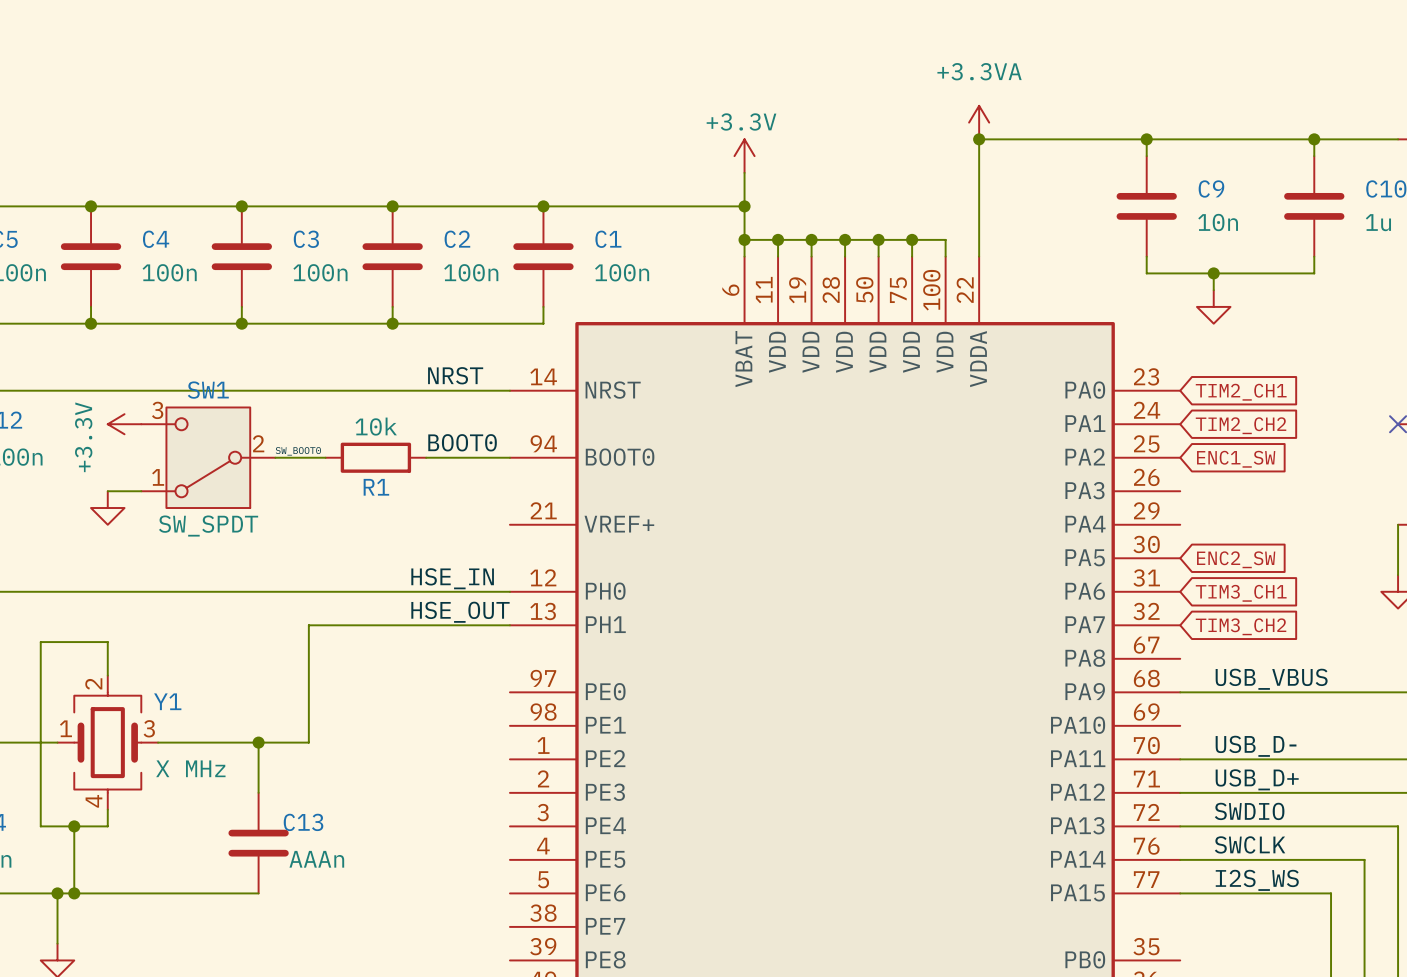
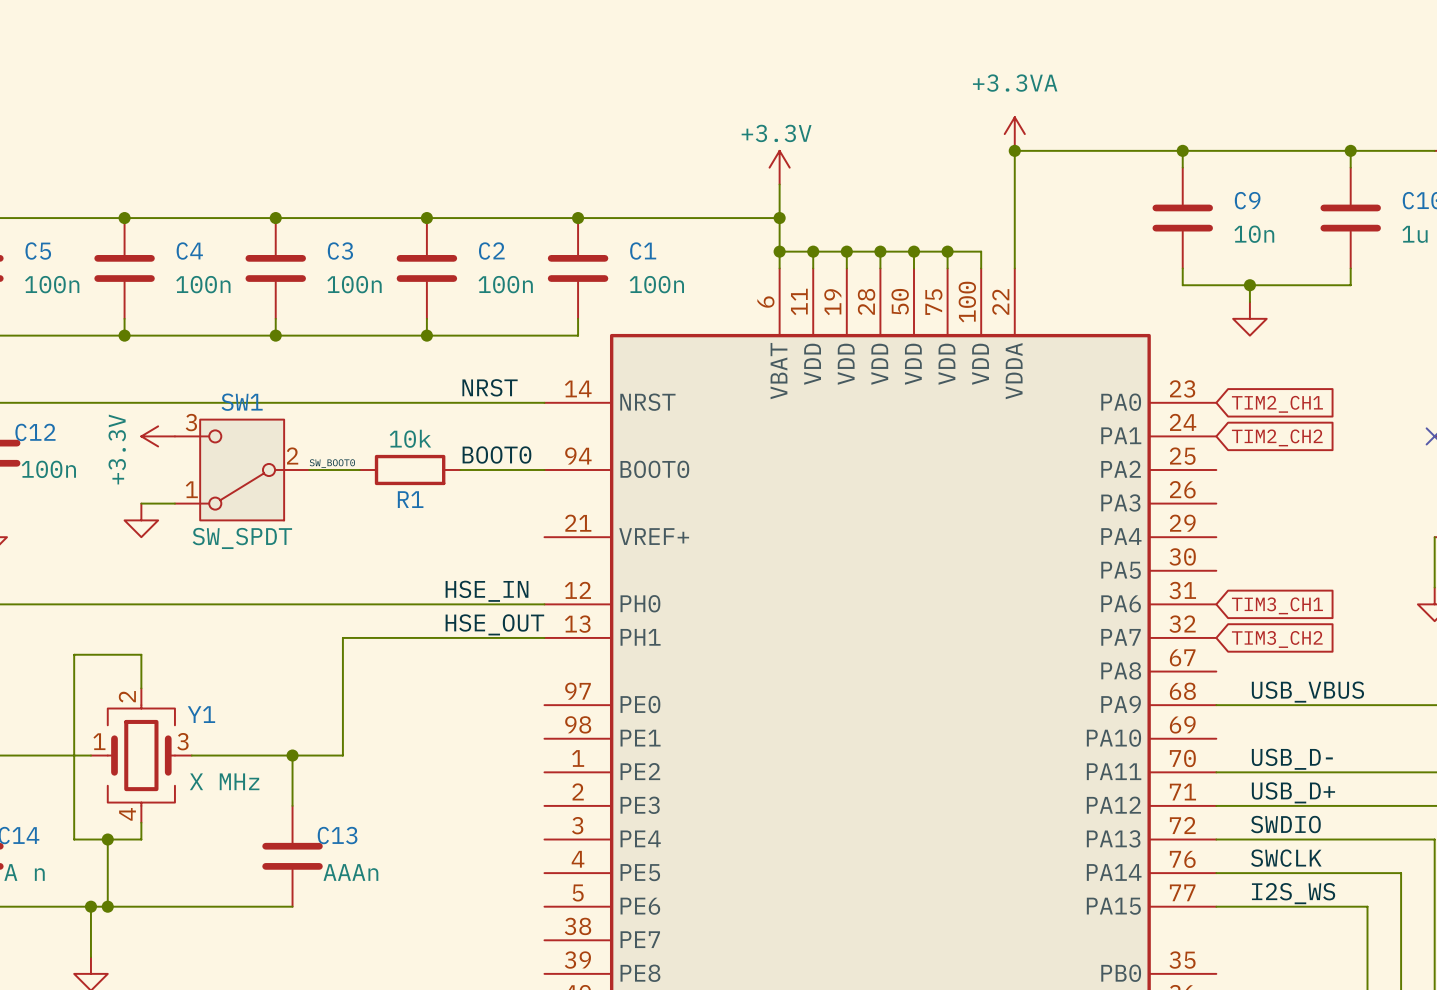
global label: ENC1_SW (1236, 459) -> none
global label: ENC2_SW (1236, 559) -> none

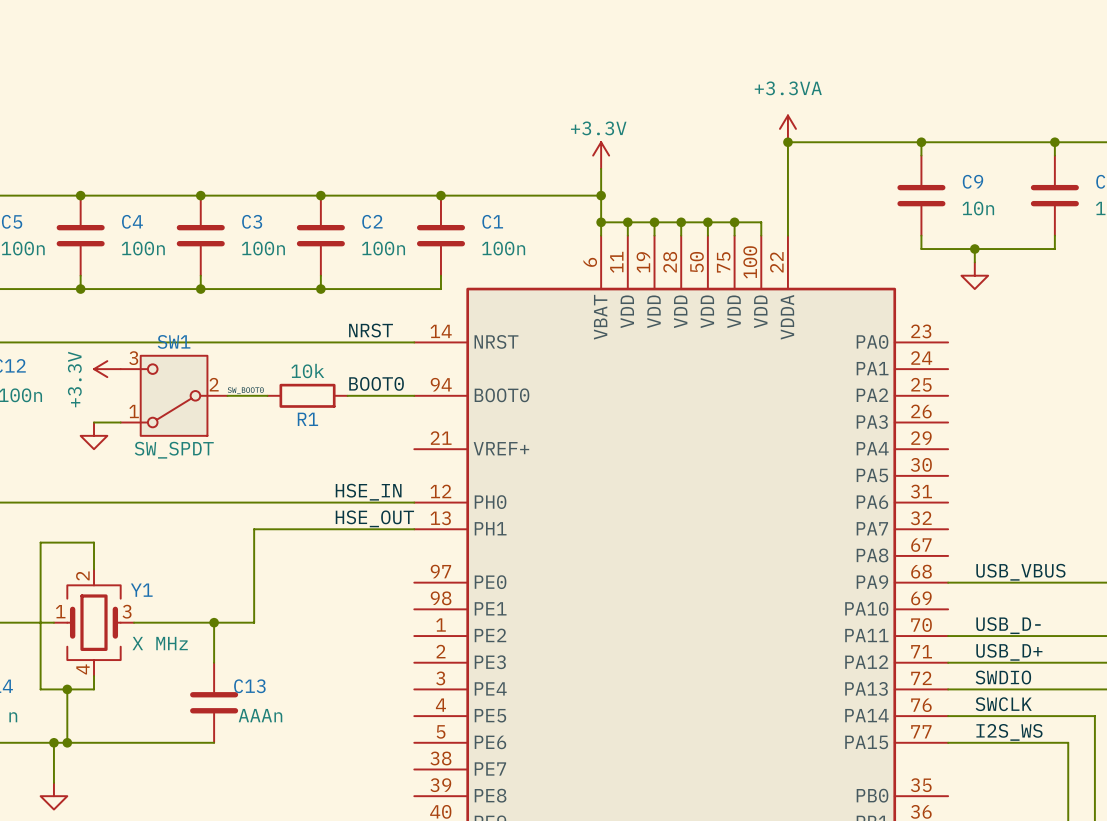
global label: TIM2_CH1 (1277, 404) -> none
global label: TIM2_CH2 (1277, 437) -> none
global label: TIM3_CH1 (1277, 605) -> none
global label: TIM3_CH2 (1277, 639) -> none

